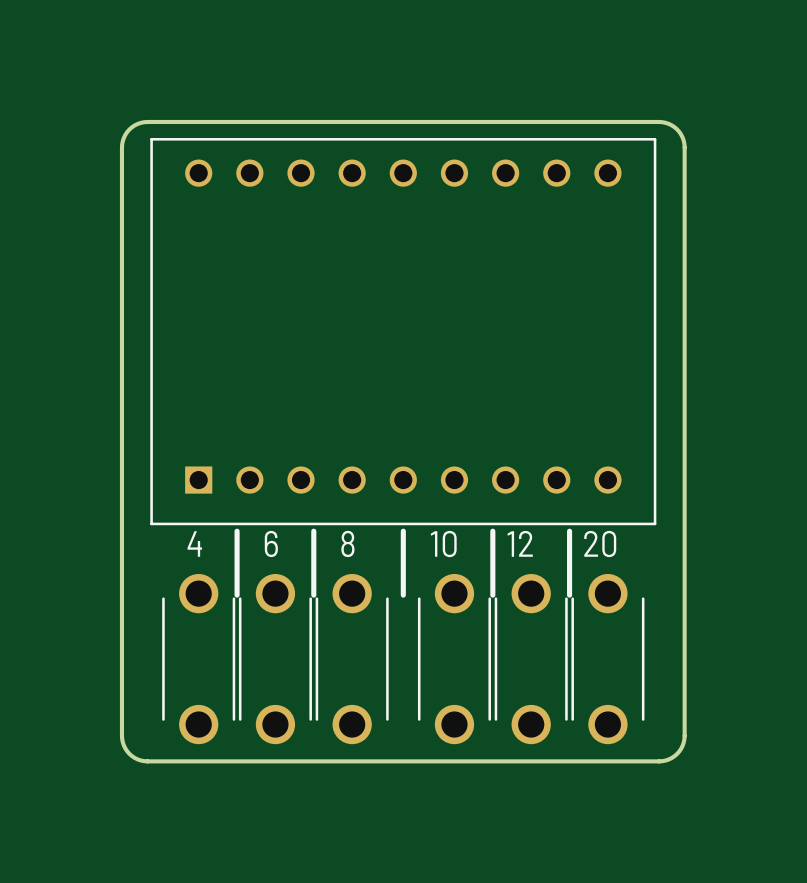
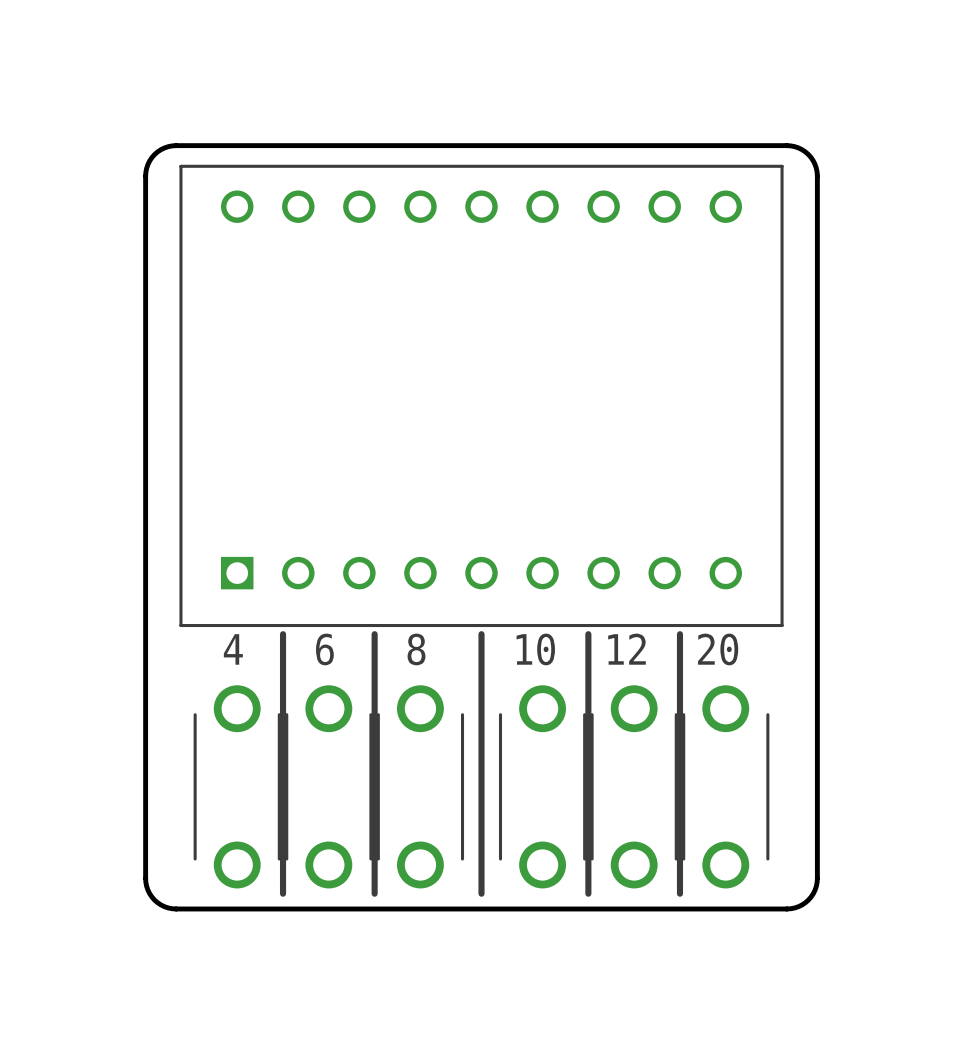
line: none -> (283, 710) (283, 893)
line: none -> (374, 710) (374, 893)
line: none -> (481, 710) (481, 893)
line: none -> (588, 710) (588, 893)
line: none -> (679, 710) (679, 893)

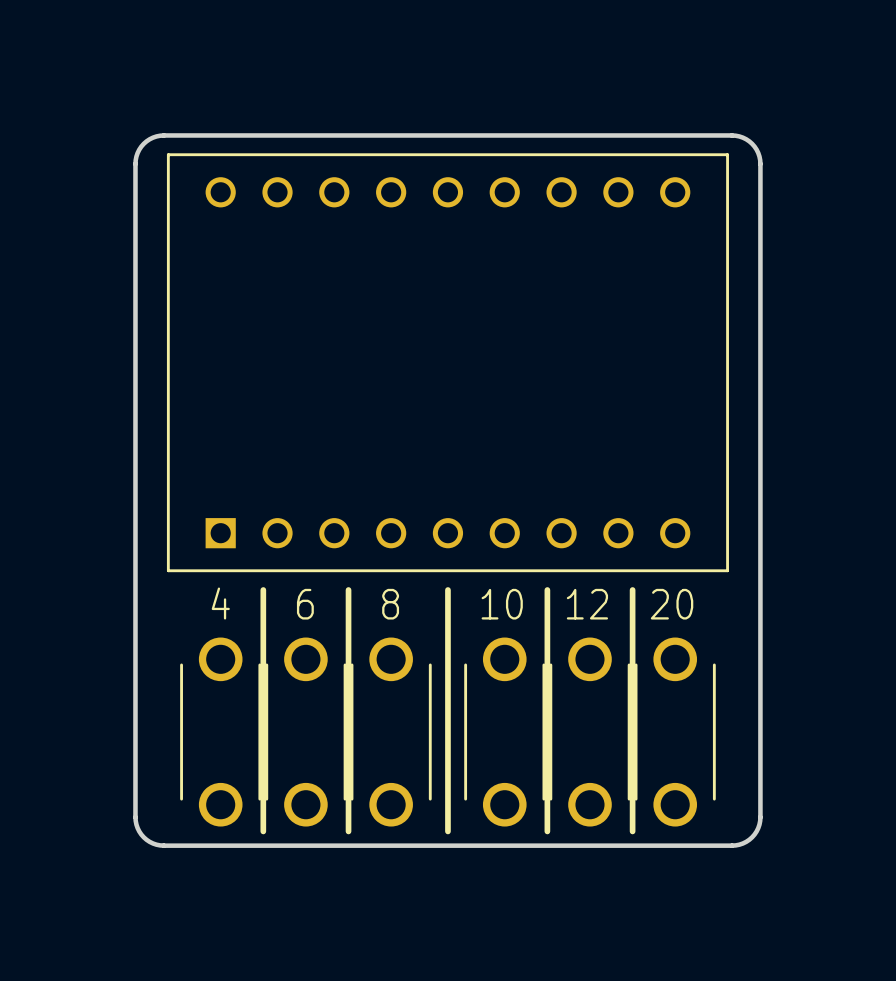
part footprint: [179, 164, 784, 628] -> [166, 153, 729, 573]

